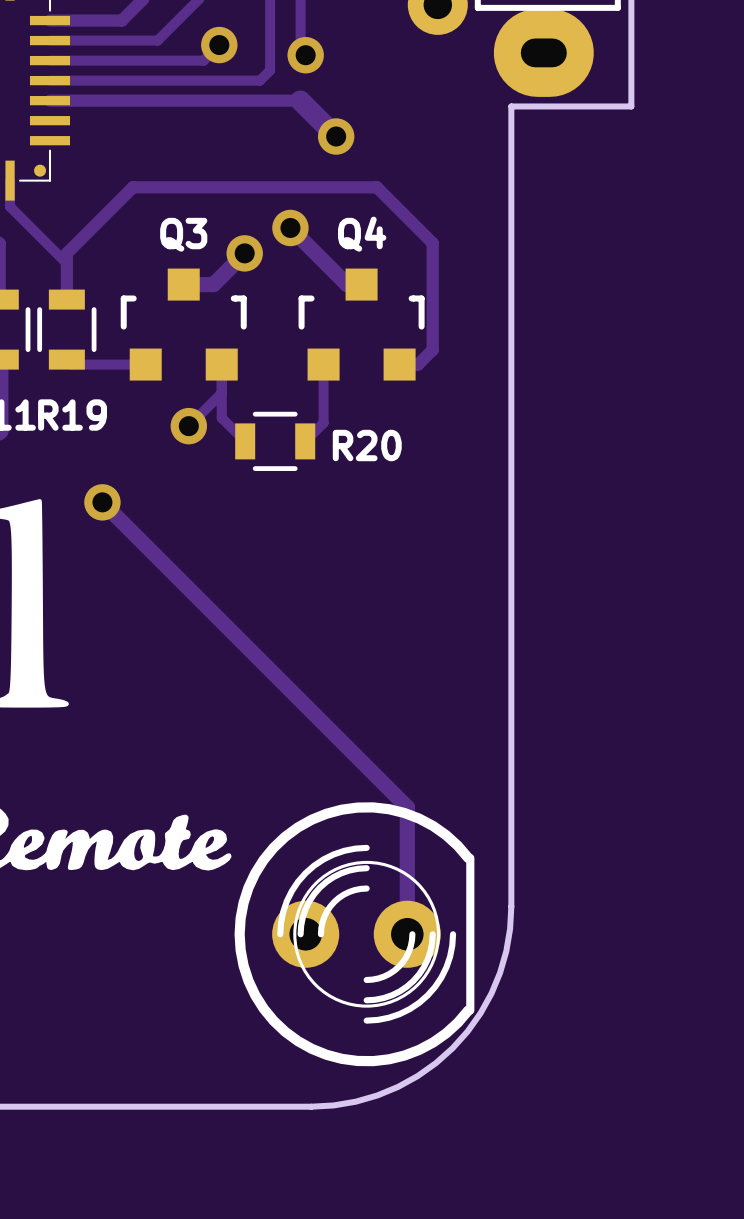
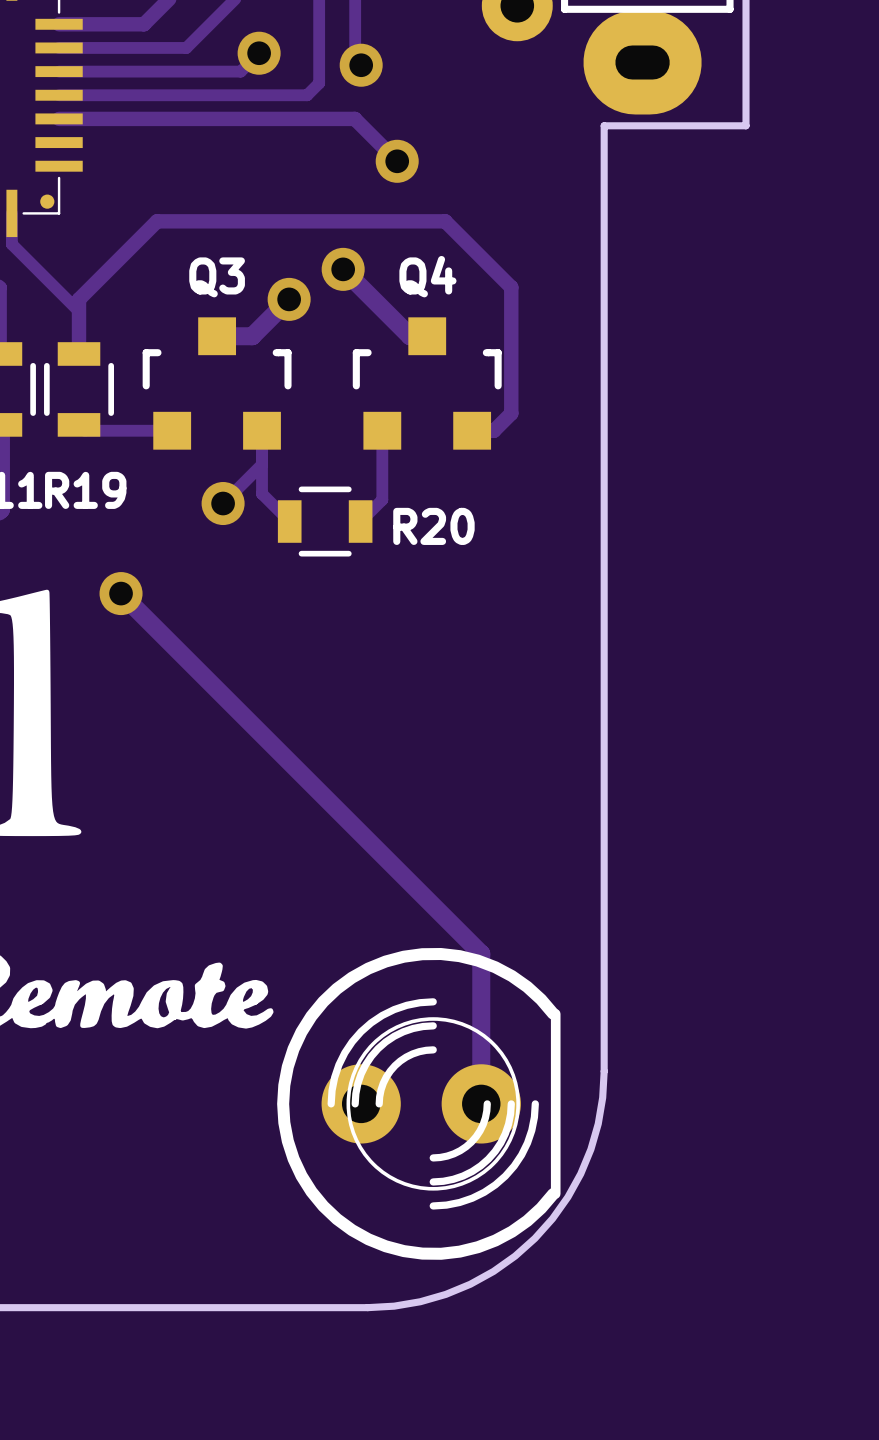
track width: thick (300, 100) (336, 136) -> thin (354, 118) (397, 161)

